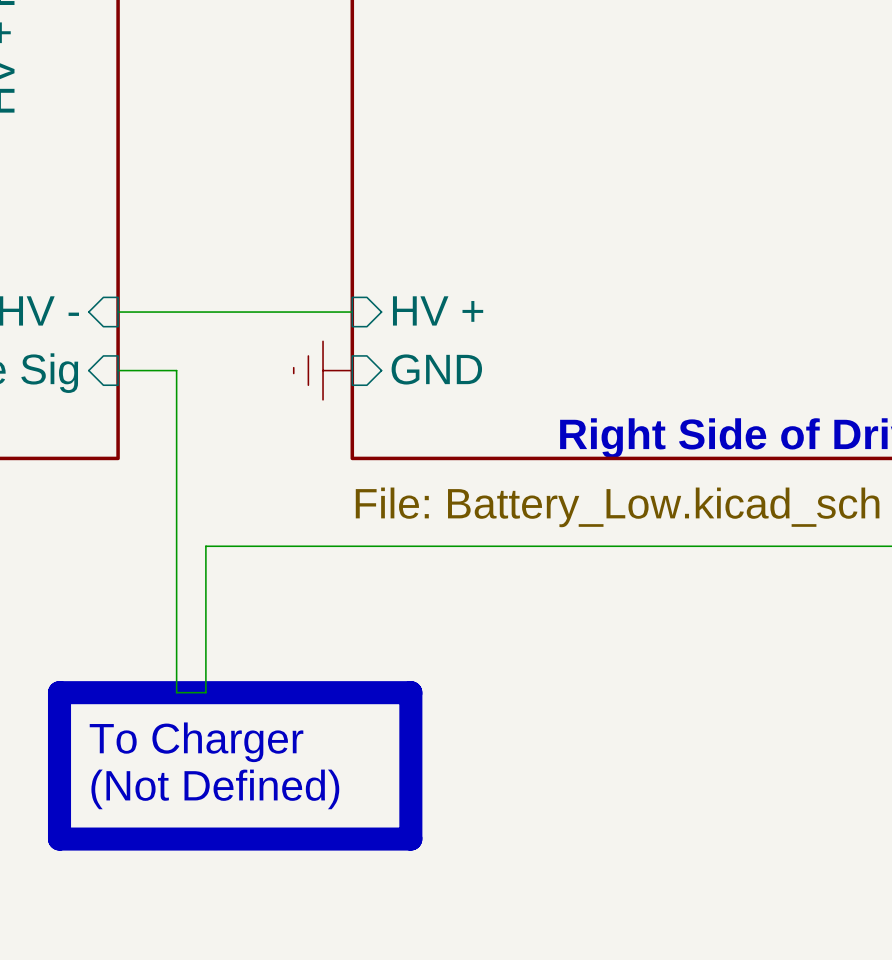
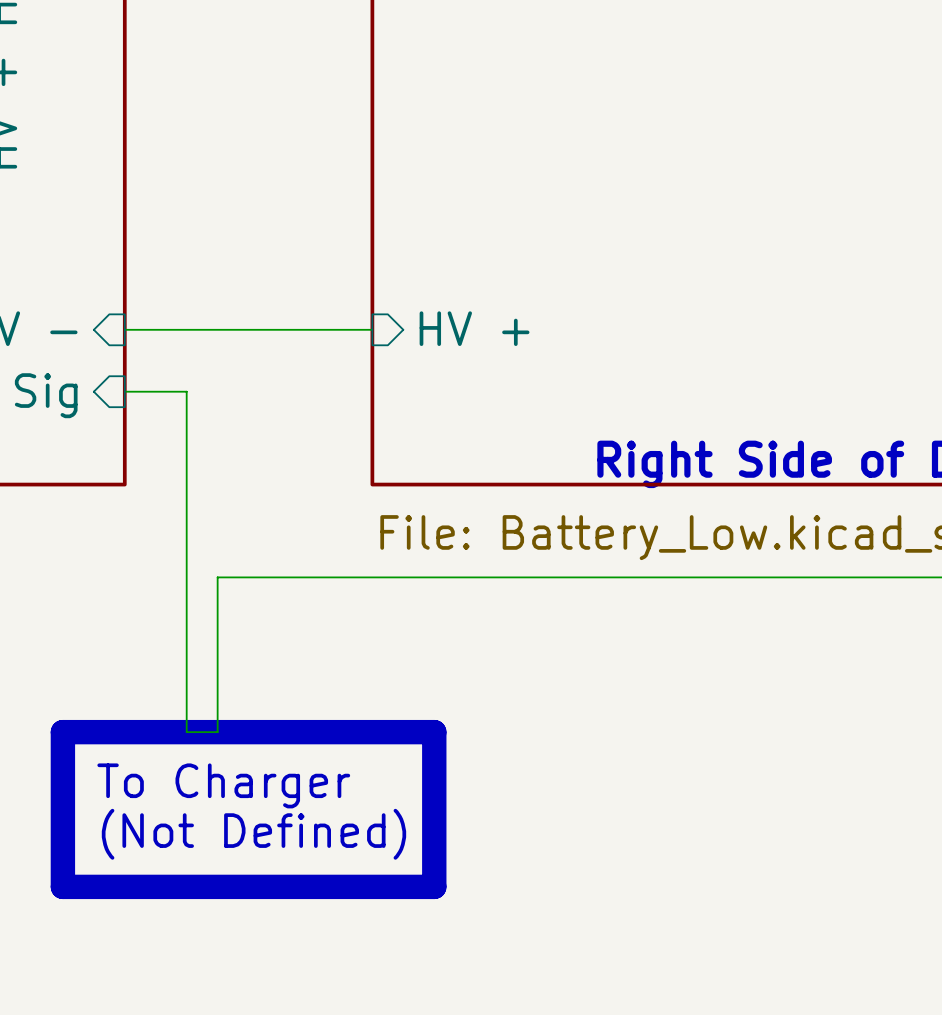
sheet pin: GND (436, 369) -> none
power symbol: (323, 370) -> none

